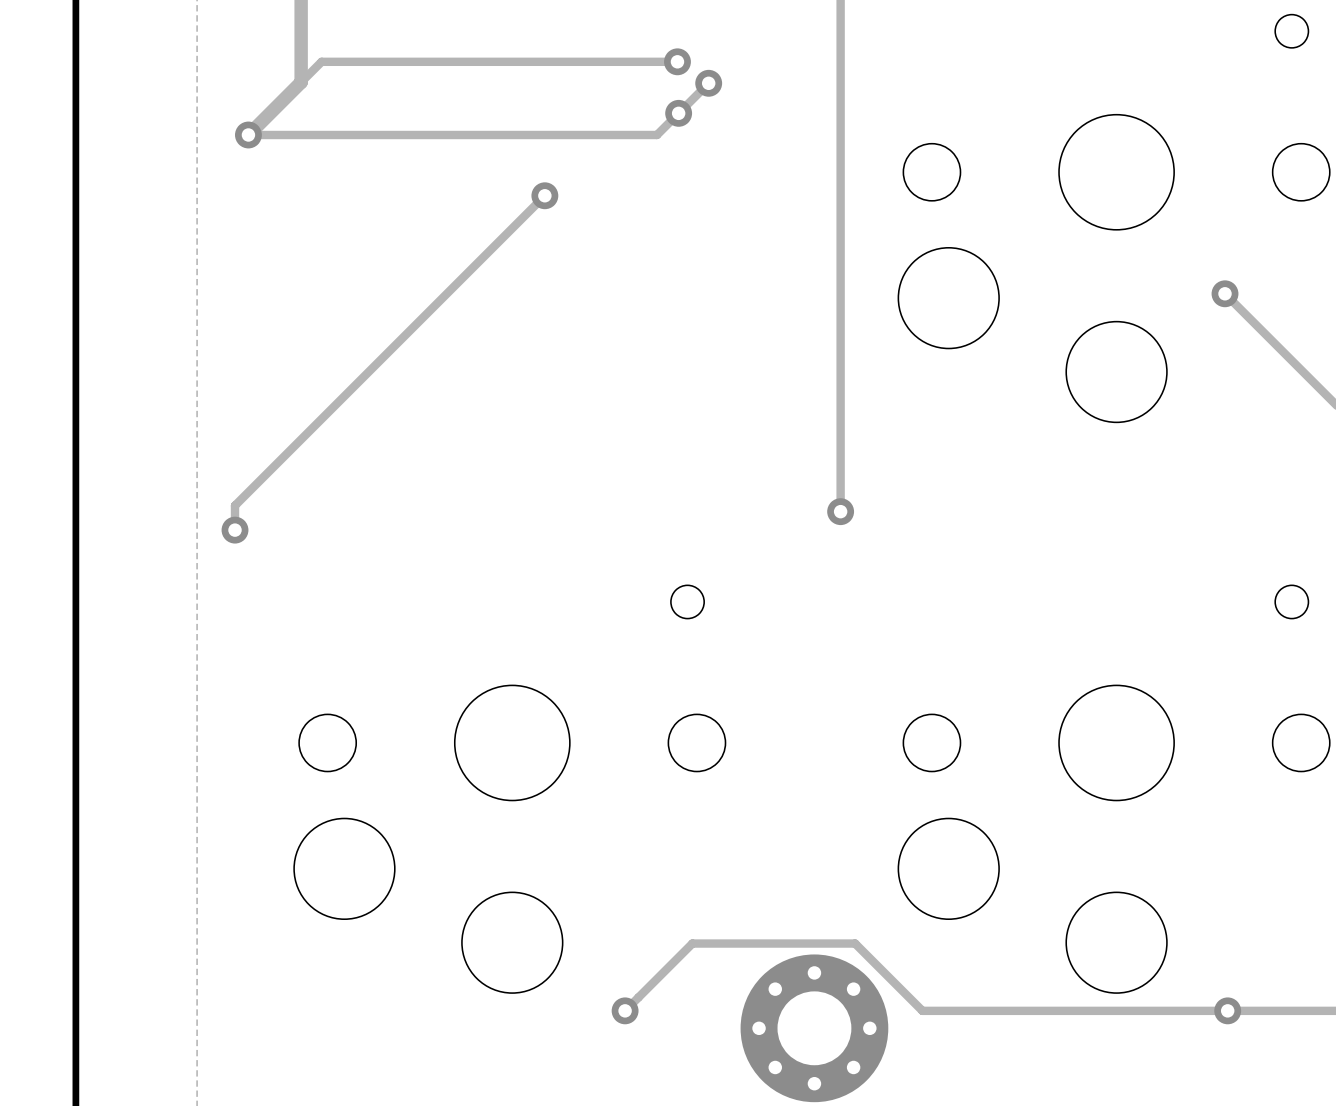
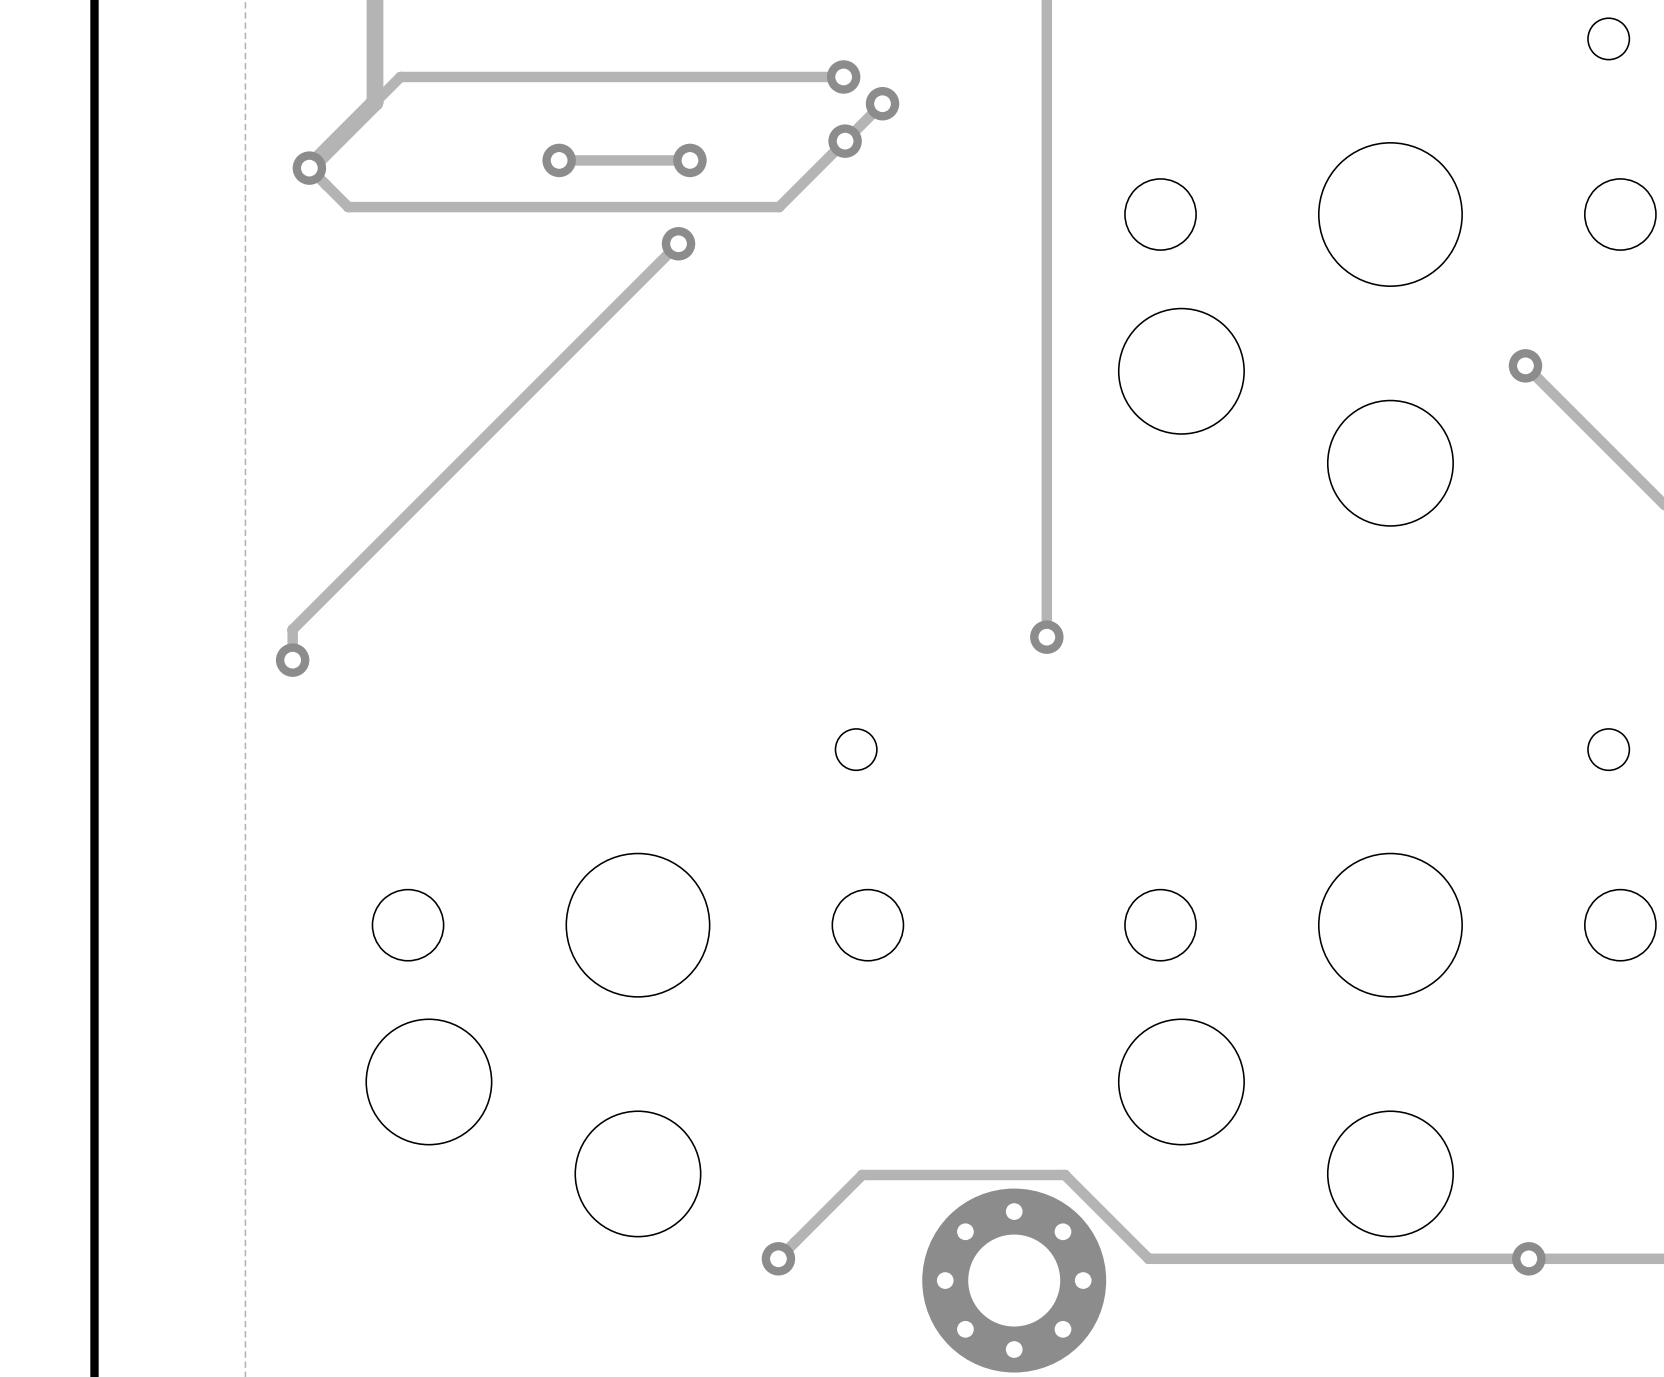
track: none -> (559, 160) (689, 160)
via: none -> (559, 160)
via: none -> (689, 160)
track: (248, 134) (656, 134) -> (309, 168) (348, 207) (779, 207) (818, 168)

